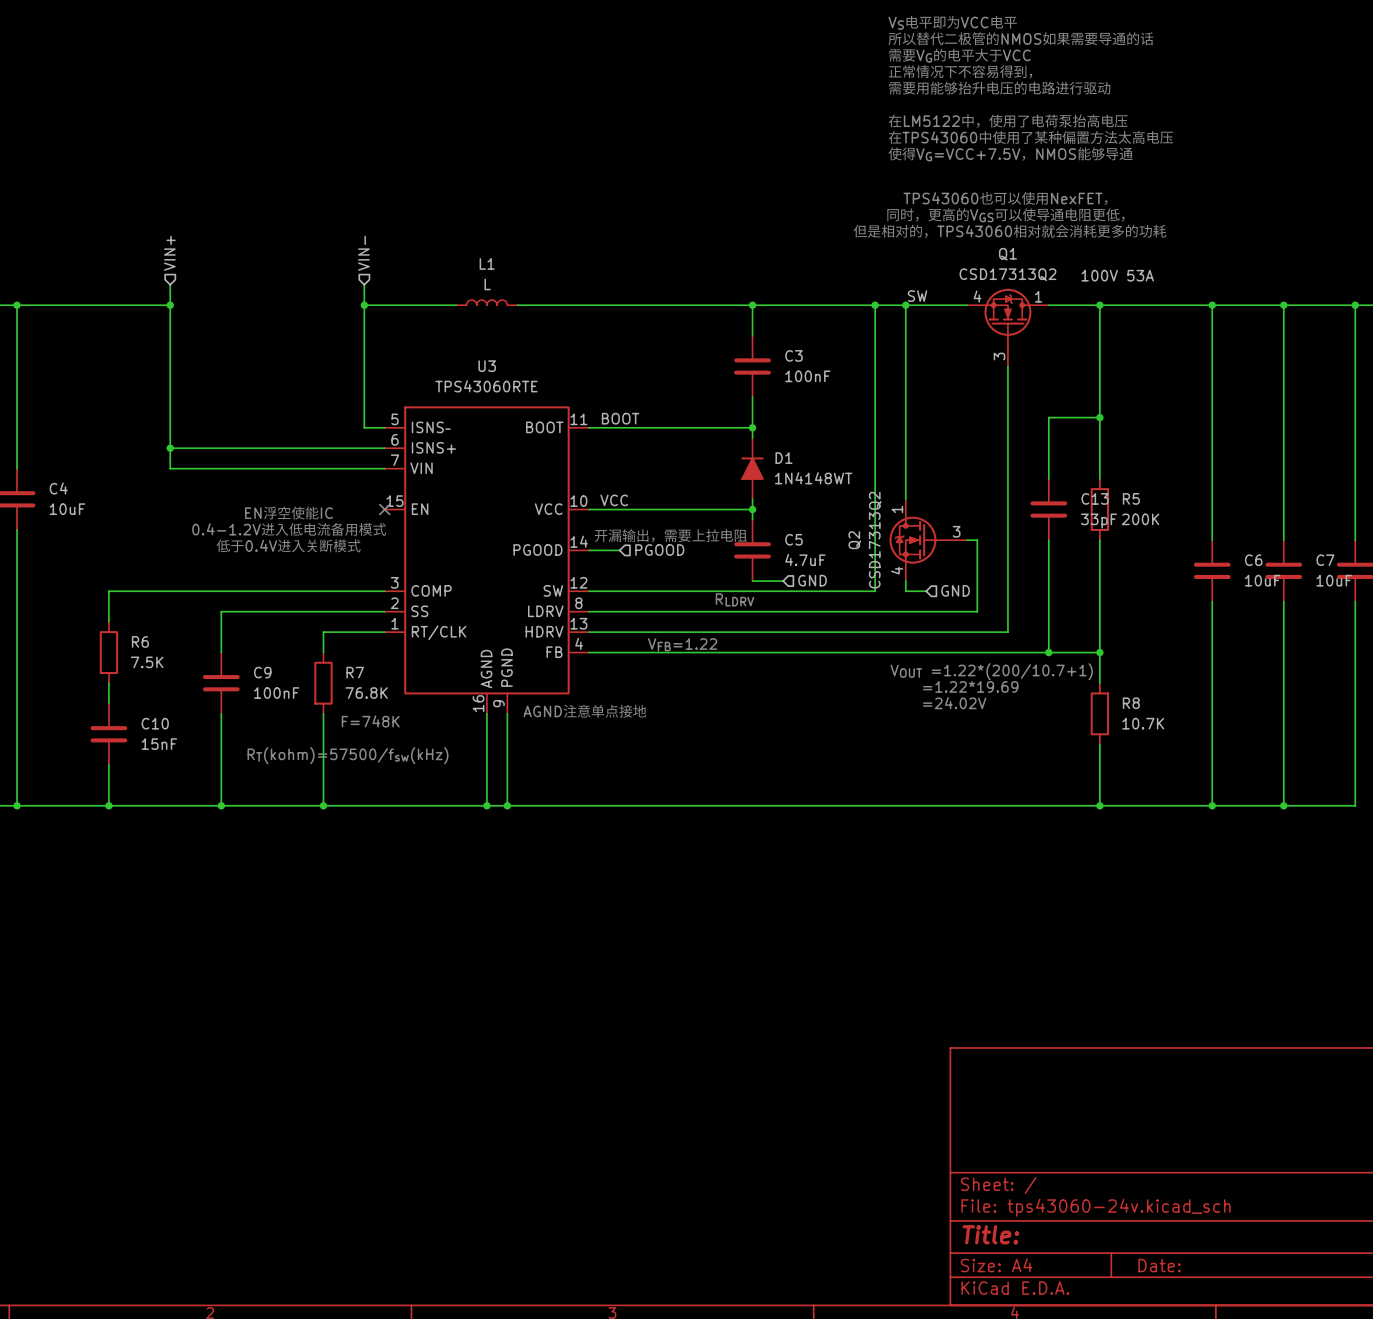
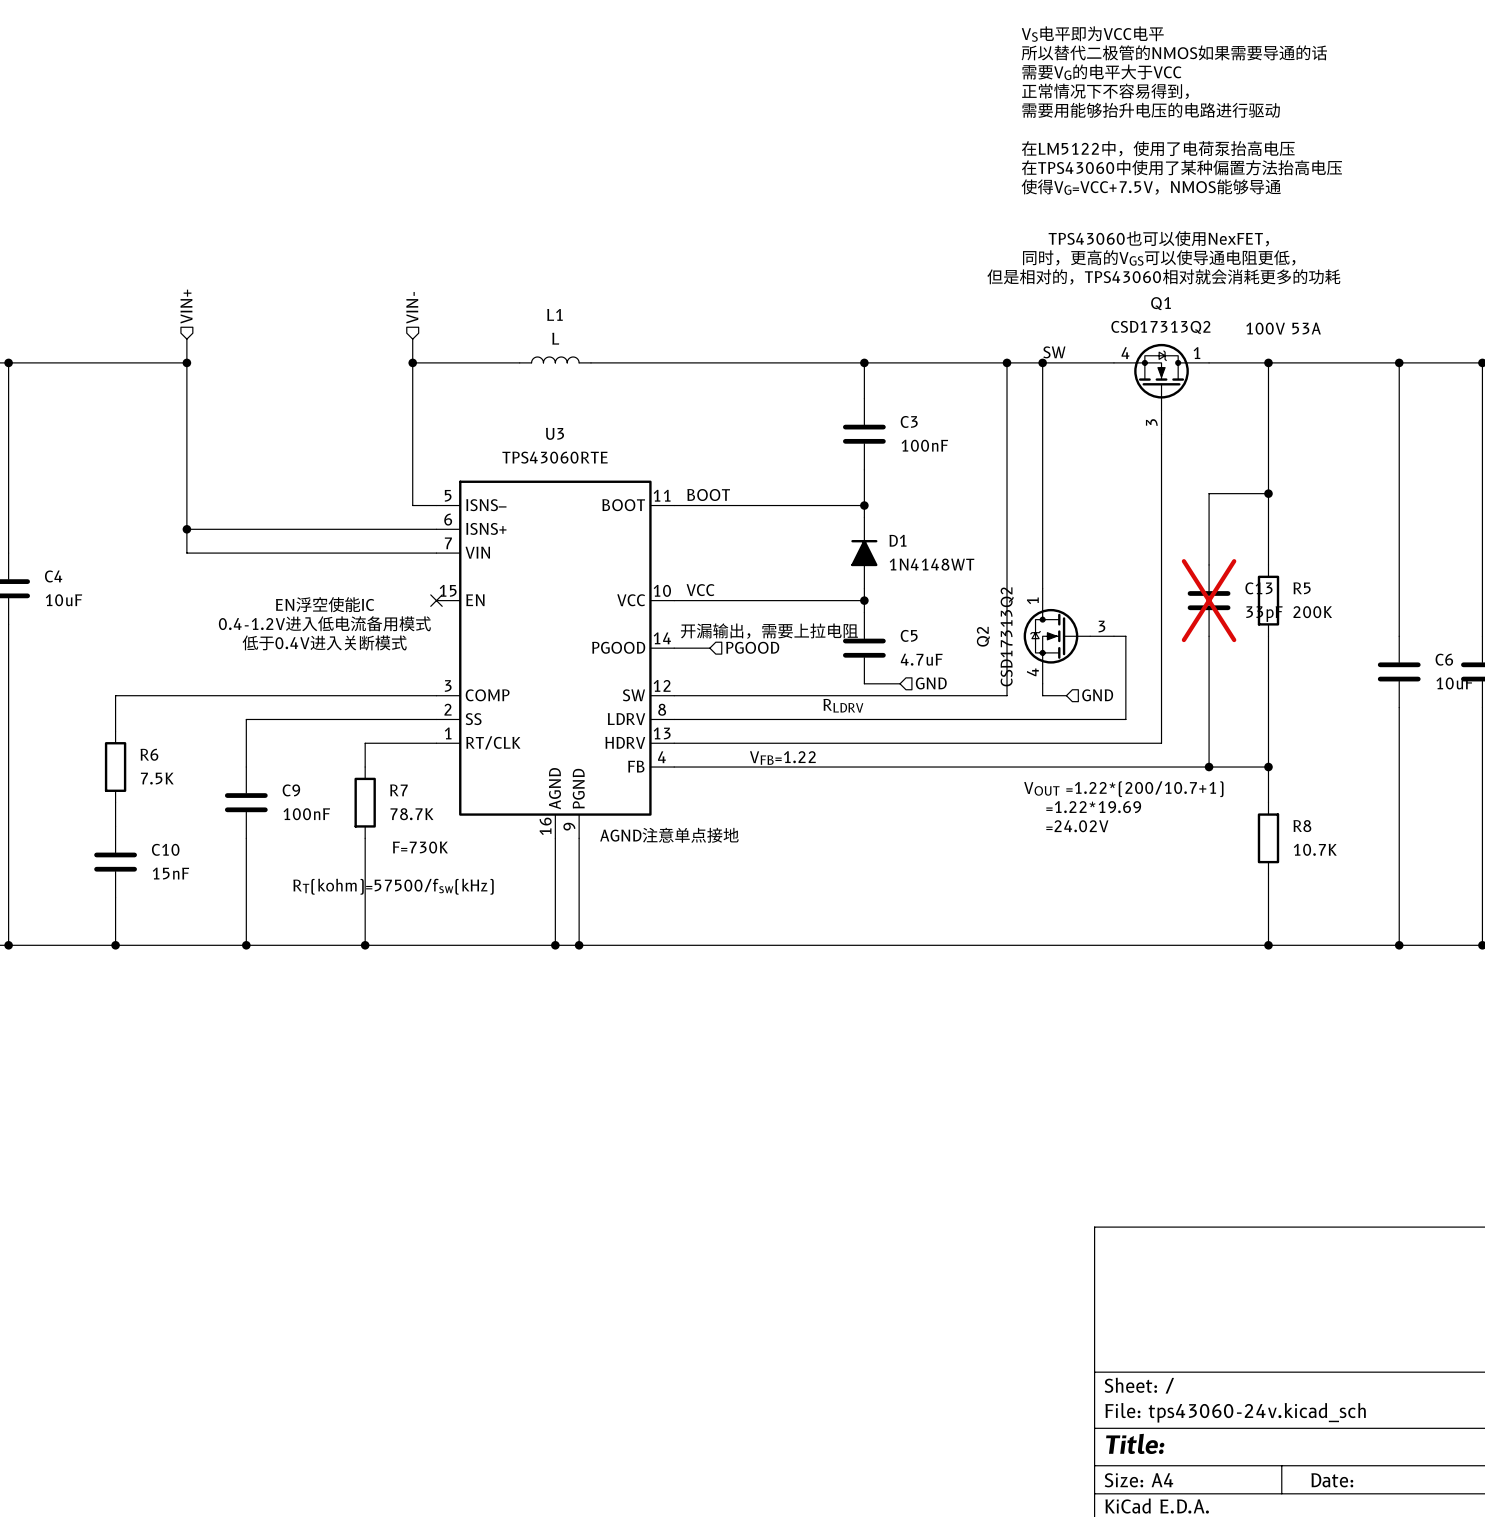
text: 在TPS43060中使用了某种偏置方法太高电压 (1030, 137) -> 在TPS43060中使用了某种偏置方法抬高电压 (1181, 167)
C13 do-not-place cross: none -> (1209, 600)
R7 value: 76.8K (366, 693) -> 78.7K (411, 814)
text: F=748K (370, 721) -> F=730K (420, 847)

